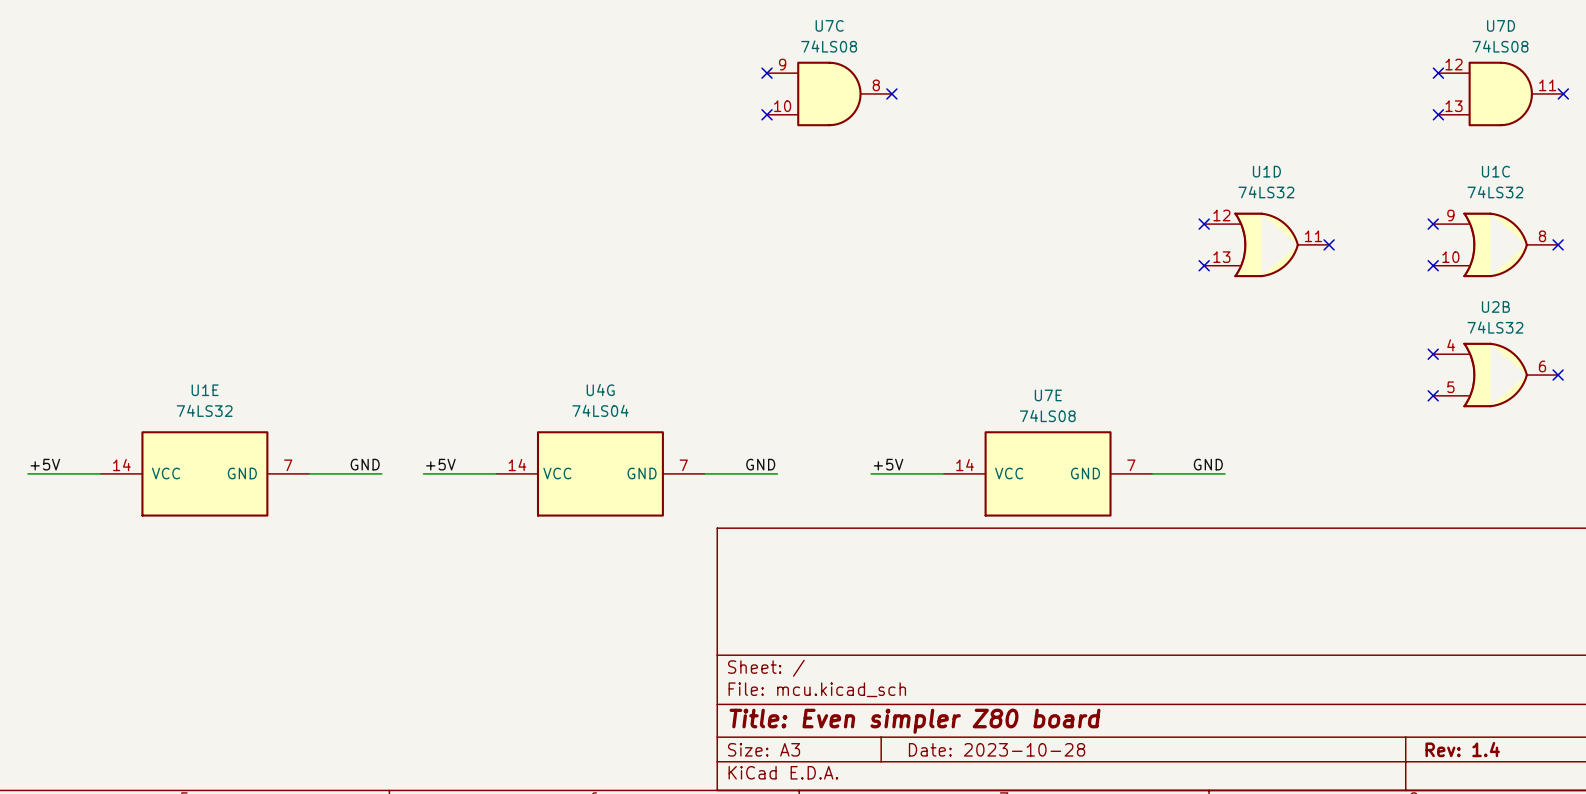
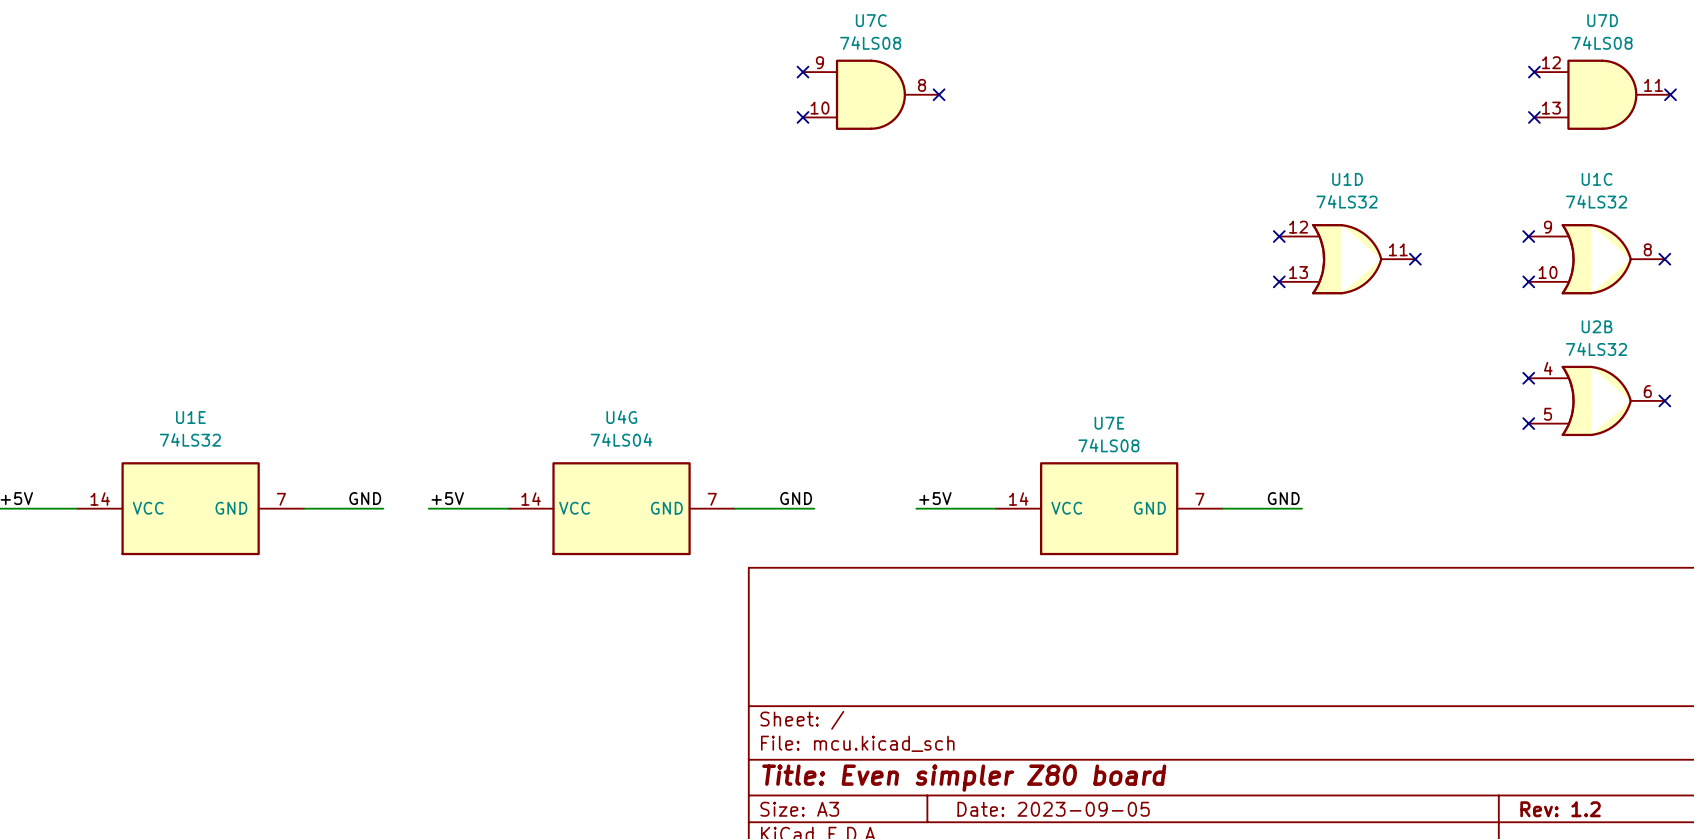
title block: Date: 2023-10-28 (997, 749) -> Date: 2023-09-05 (1053, 809)
title block: Rev: 1.4 (1462, 749) -> Rev: 1.2 (1560, 809)

